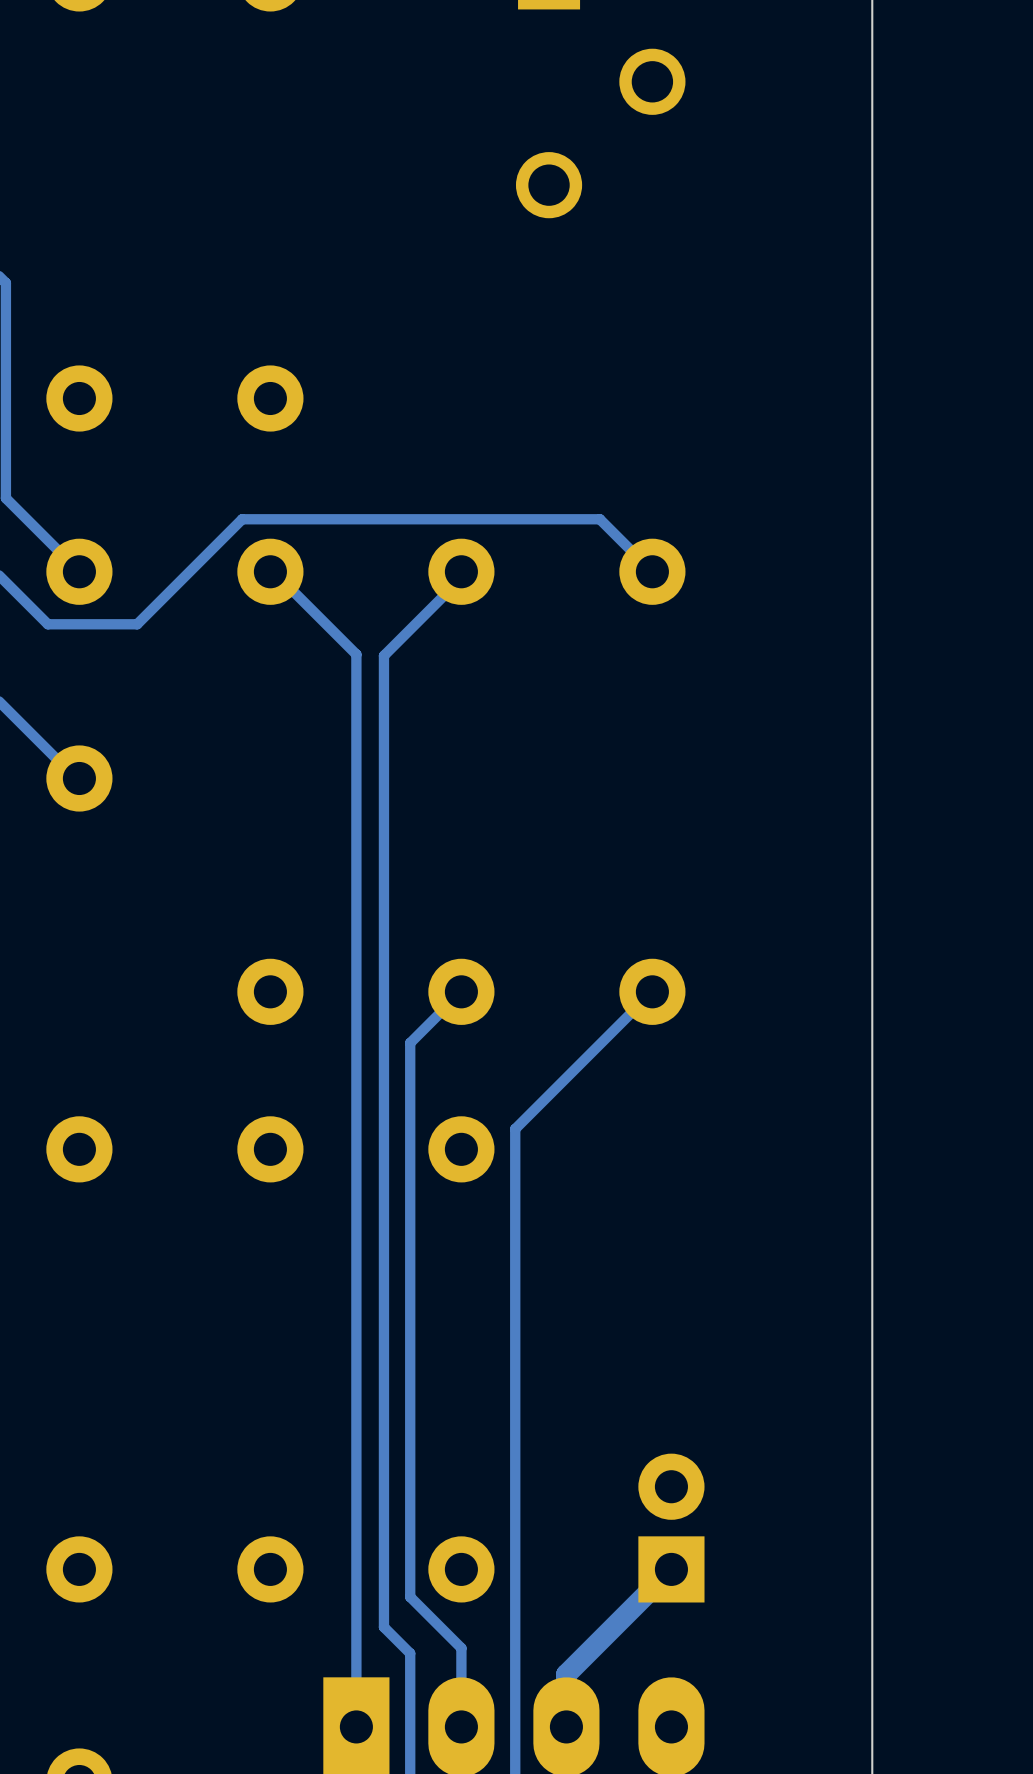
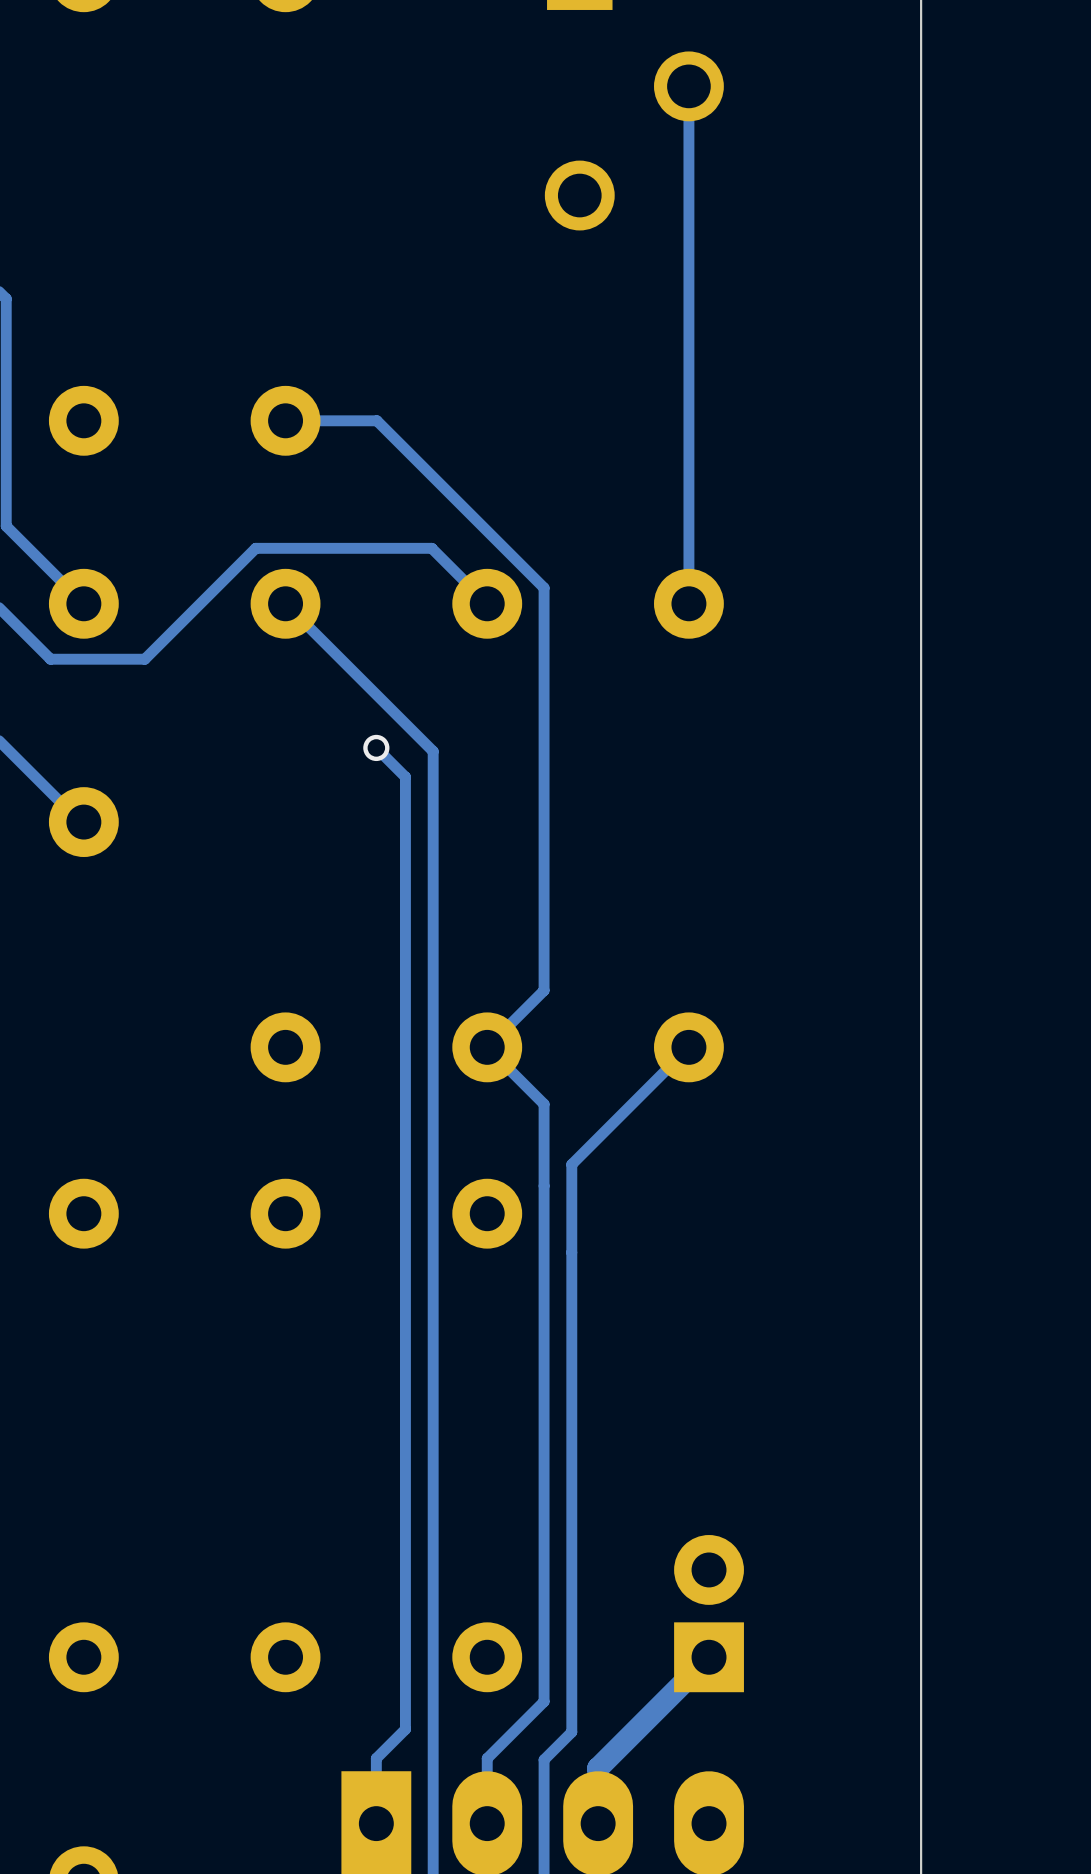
track: none -> (688, 86) (688, 603)
track: none -> (285, 420) (376, 420) (544, 587) (544, 990) (487, 1047) (544, 1104) (544, 1192)
track: (408, 519) (599, 519) (652, 571) -> (431, 548) (487, 603)
track: (270, 571) (273, 571) (356, 654) (356, 1665) -> (405, 1718) (405, 1729) (376, 1758)
track: (461, 571) (461, 578) (383, 655) (383, 735) -> (376, 747) (405, 777)
via: none -> (376, 747)
track: (461, 991) (410, 1043) -> (285, 603) (433, 751) (433, 1101)
track: (541, 1102) (515, 1129) -> (571, 1164) (571, 1732) (544, 1759)
track: (410, 1596) (461, 1648) (461, 1665) -> none
track: (515, 1611) (515, 1666) -> (544, 1701) (487, 1758)
track: (383, 1627) (410, 1653) -> (433, 1686) (433, 1745)

